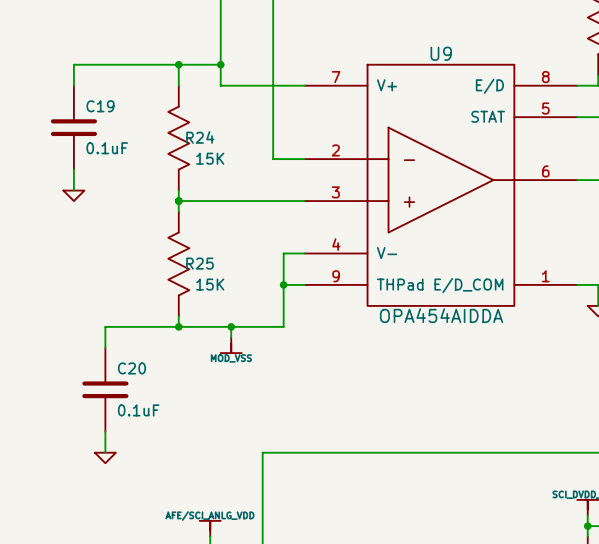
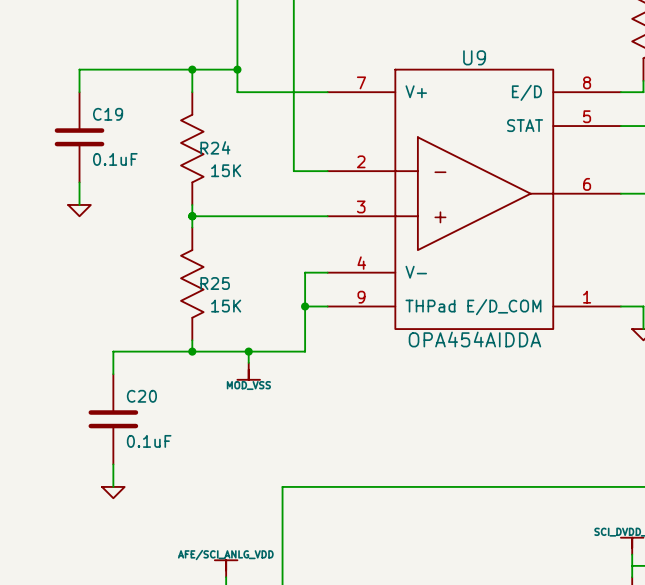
junction: (587, 526) -> none

